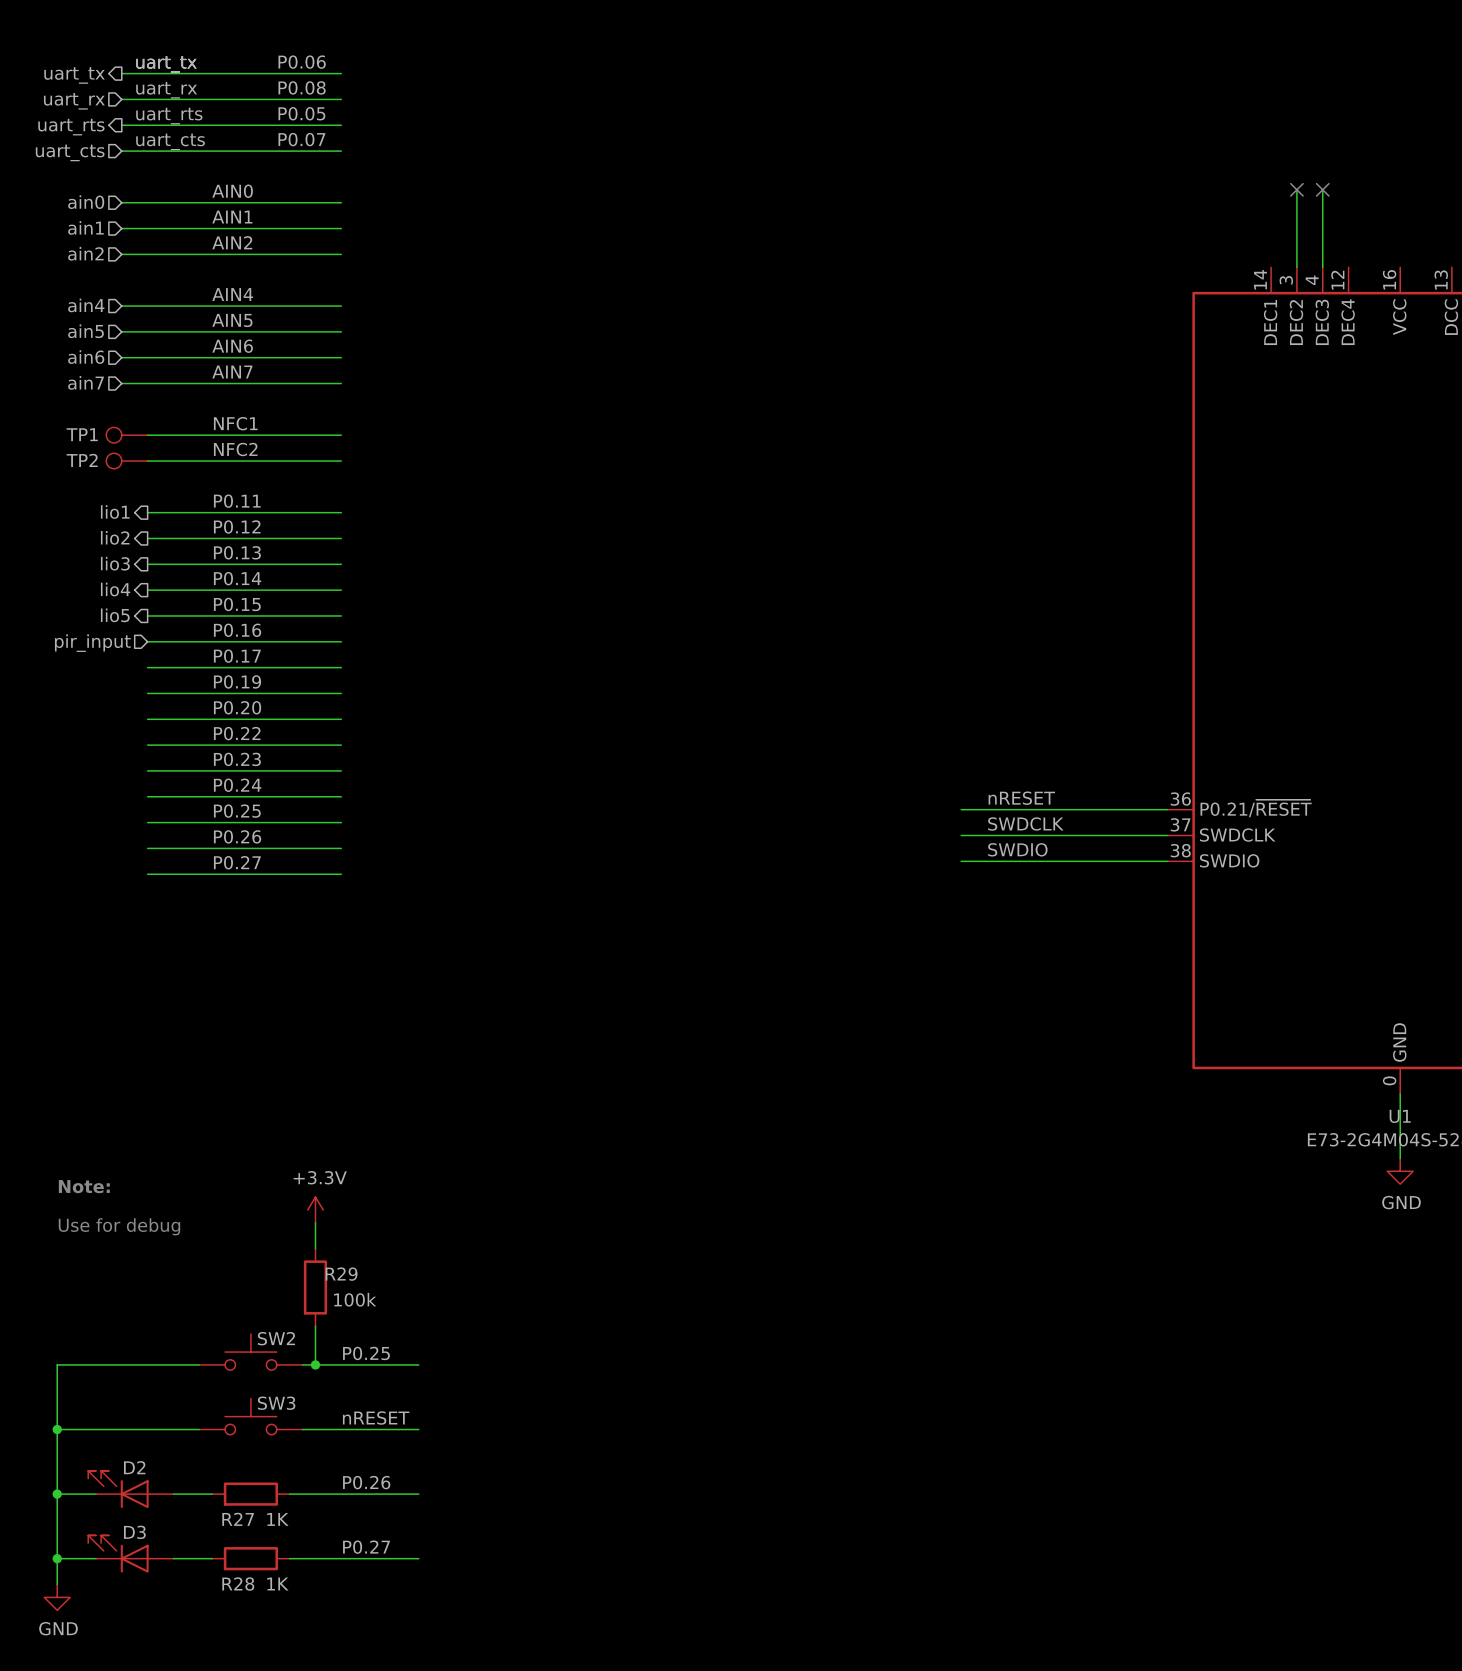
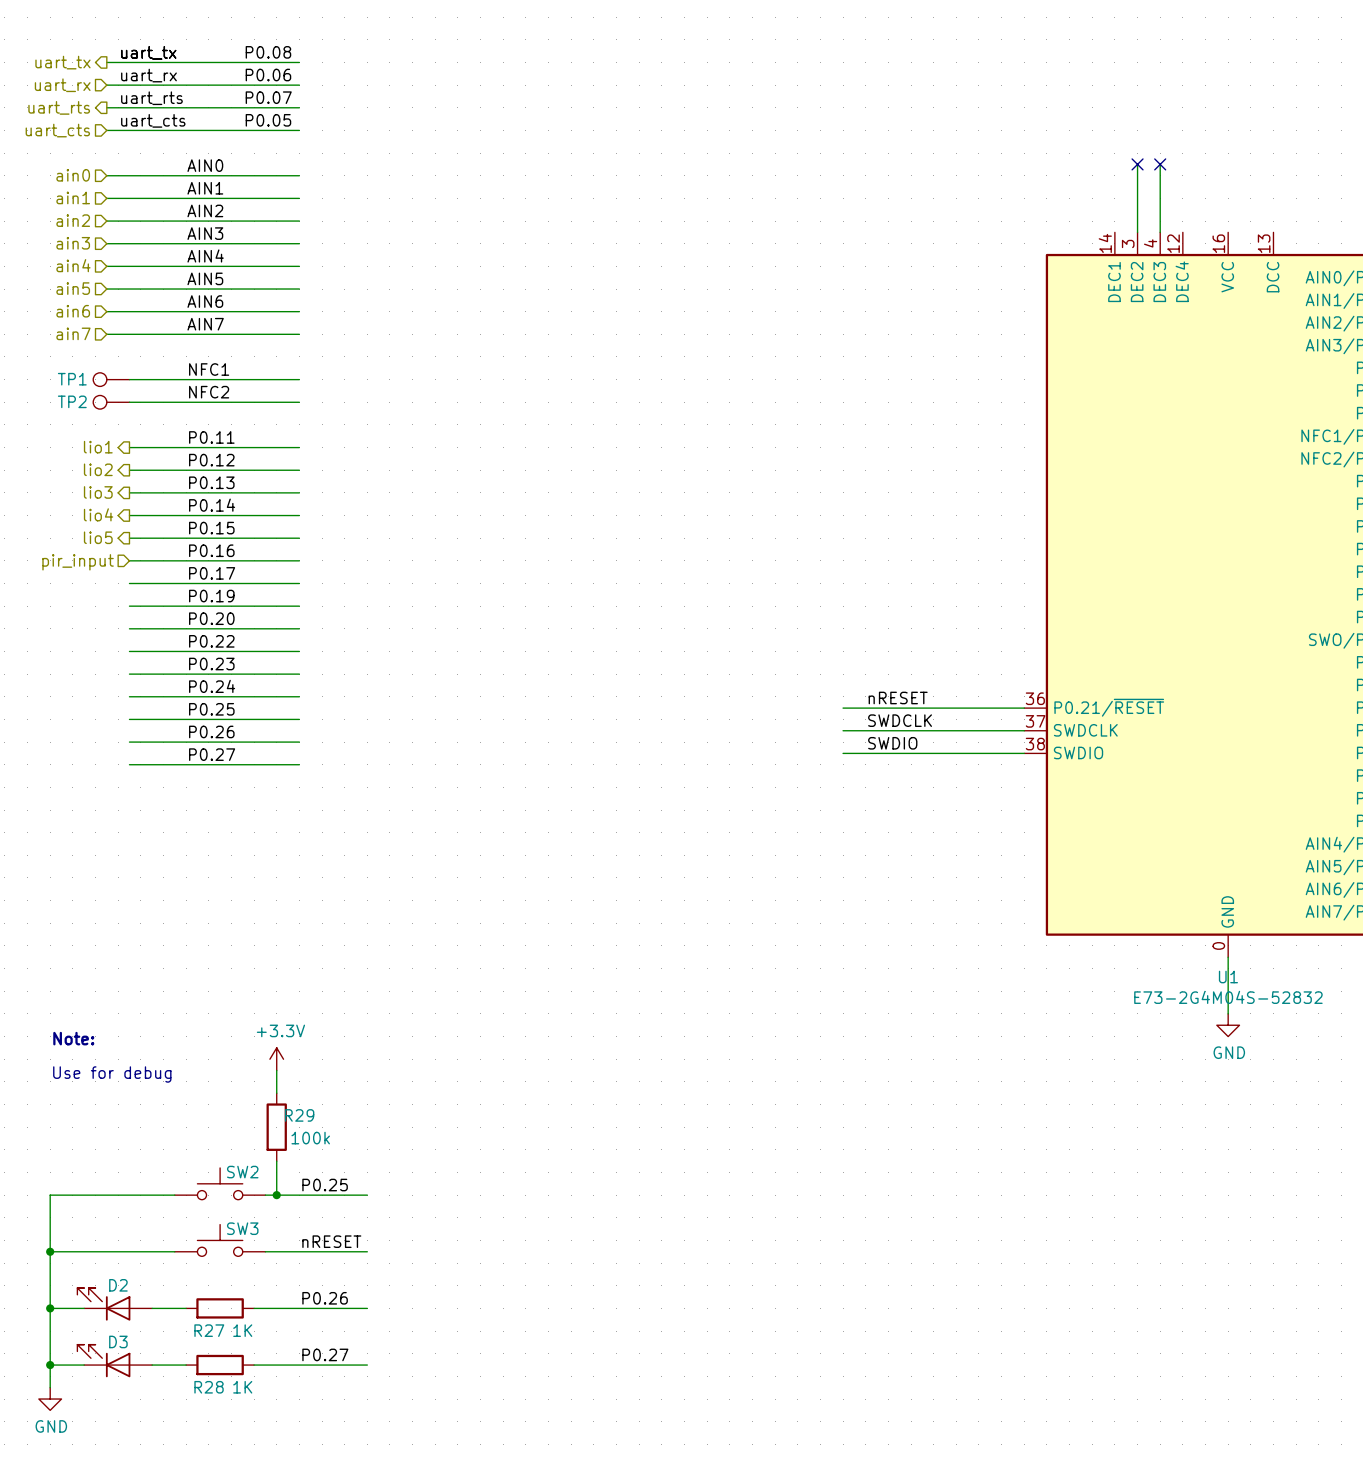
label: P0.06 (302, 62) -> P0.08 (268, 52)
label: P0.08 (302, 87) -> P0.06 (268, 75)
label: P0.05 (301, 113) -> P0.07 (268, 97)
label: P0.07 (301, 139) -> P0.05 (268, 120)
label: none -> AIN3 (205, 233)
hierarchical label: none -> ain3 (73, 243)
wire: none -> (106, 243) (299, 243)

